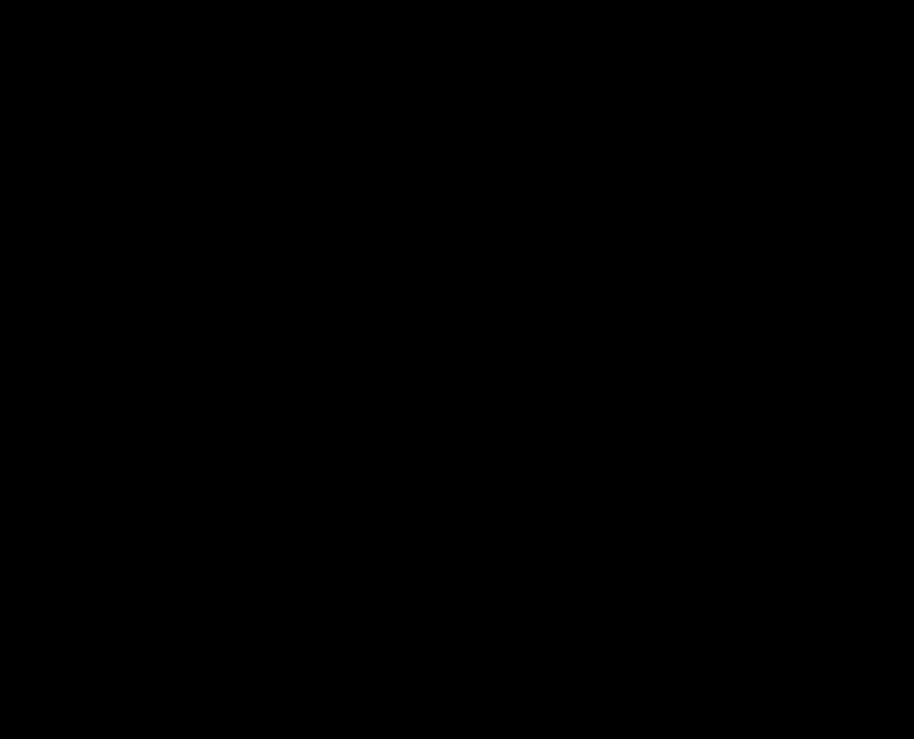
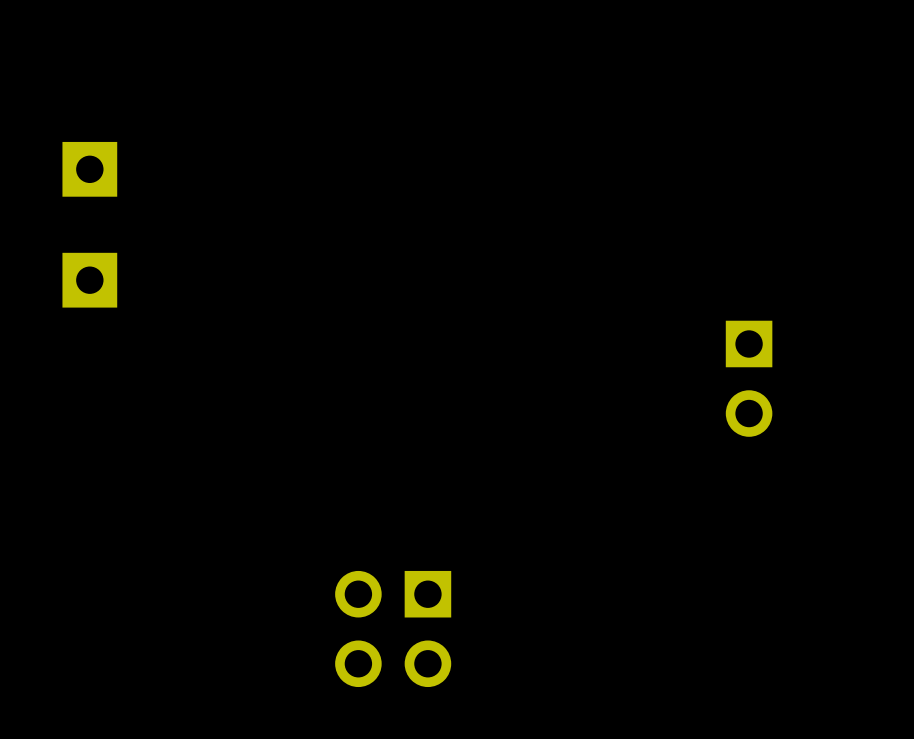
part: none -> (89, 169)
part: none -> (89, 280)
part: none -> (749, 378)
part: none -> (393, 628)

